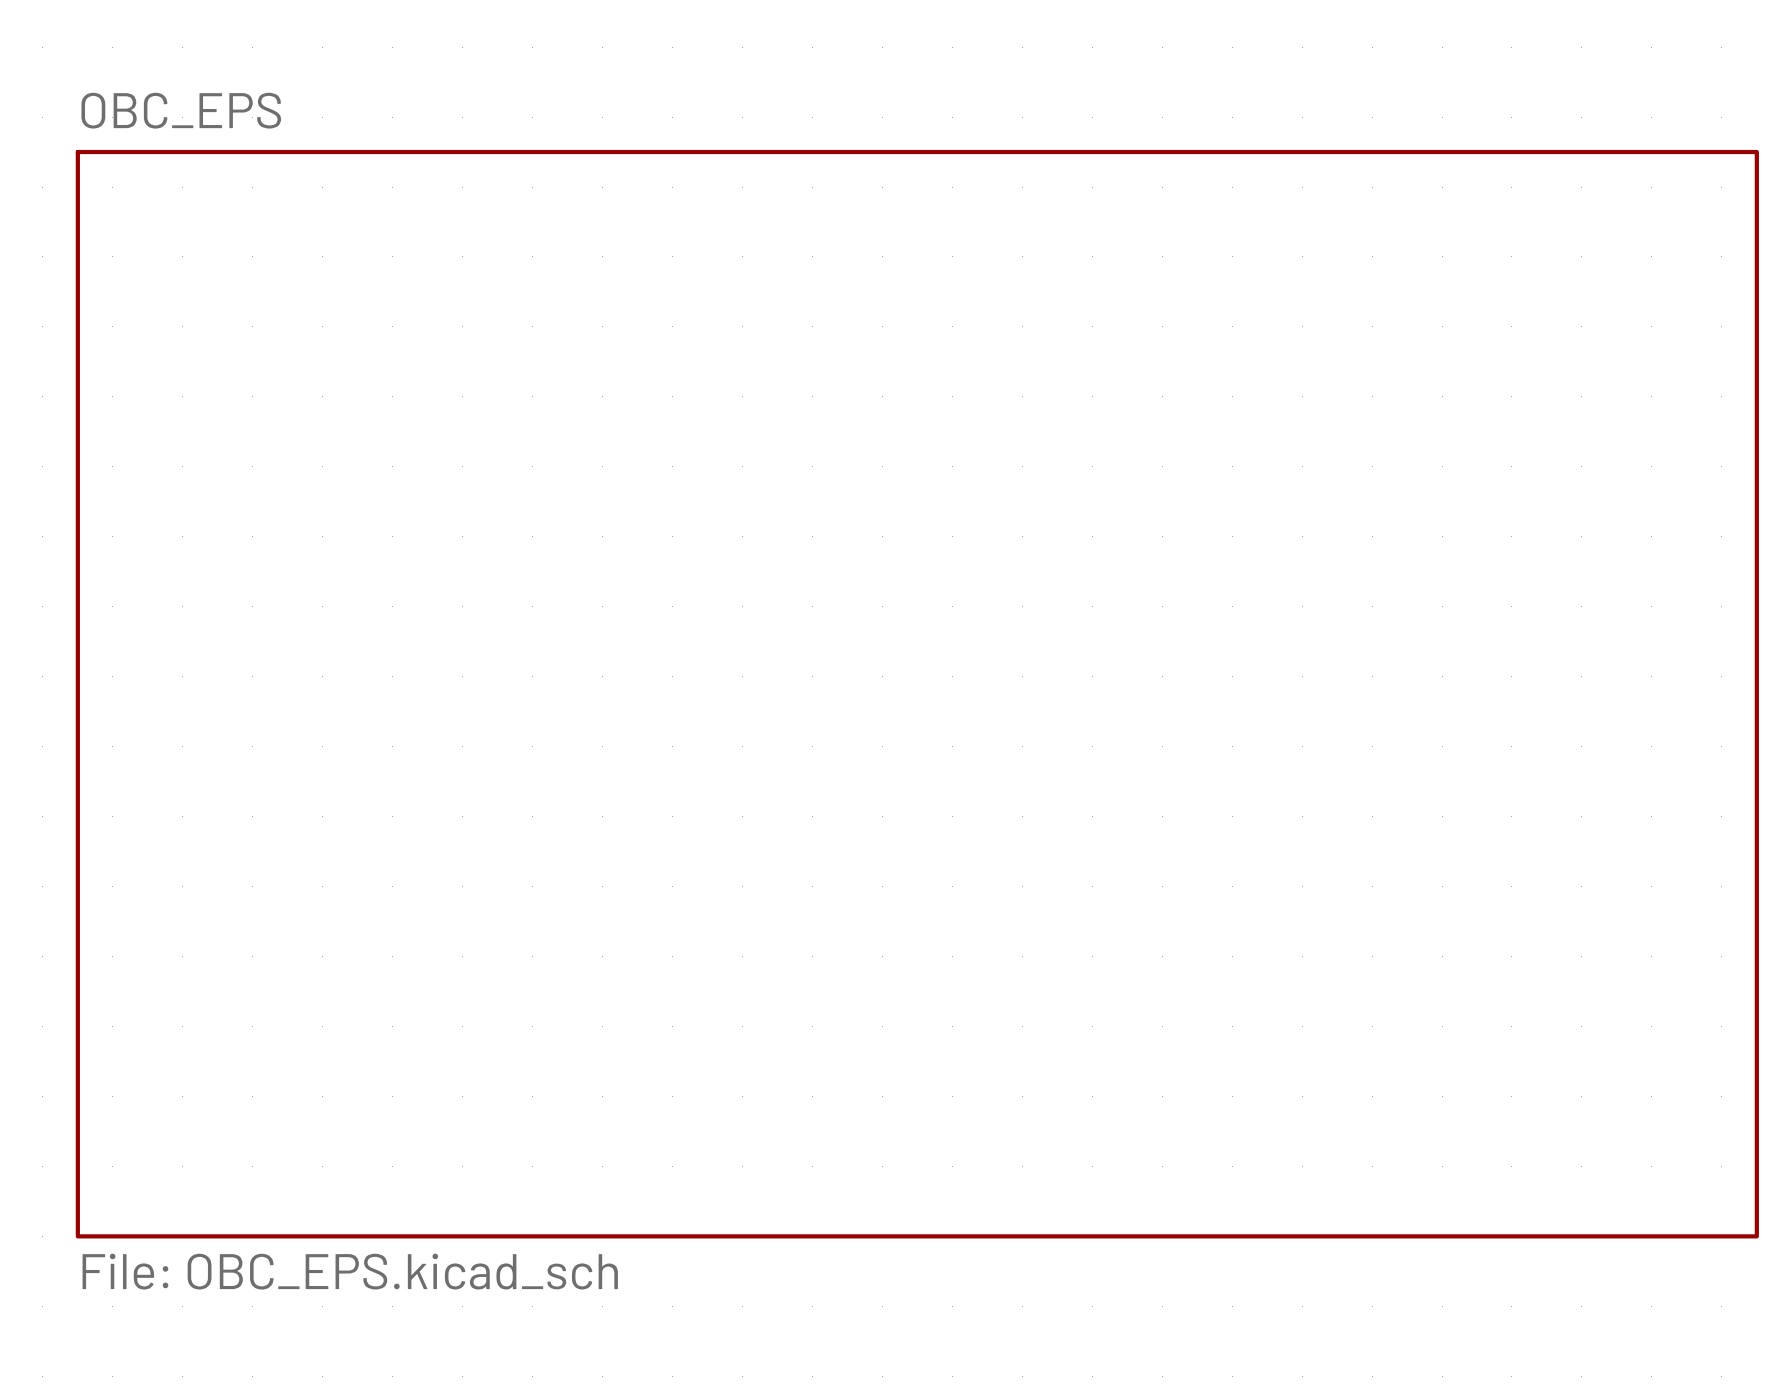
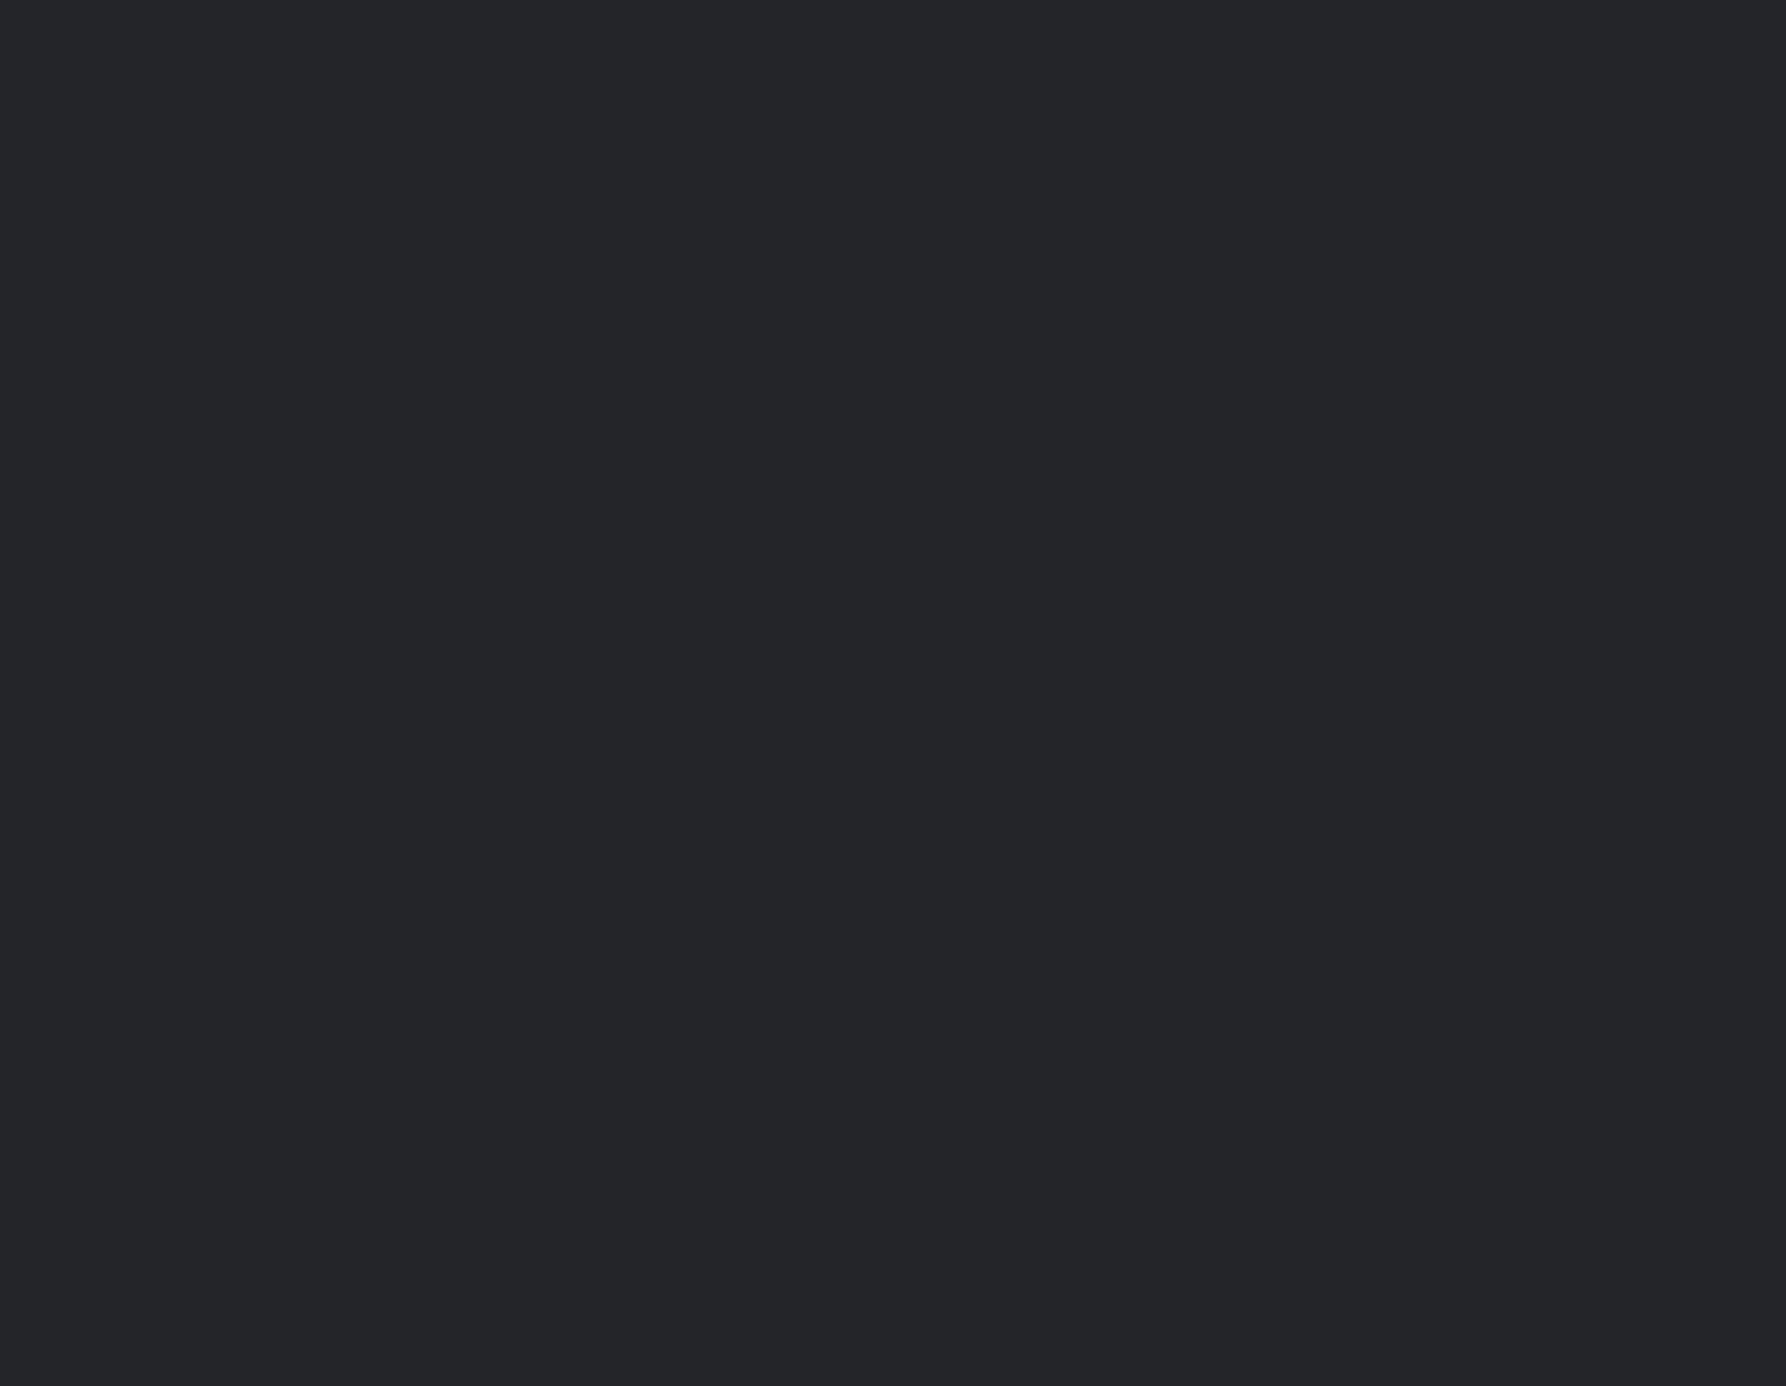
sheet OBC_EPS: File: OBC_EPS.kicad_sch (917, 694) -> none

